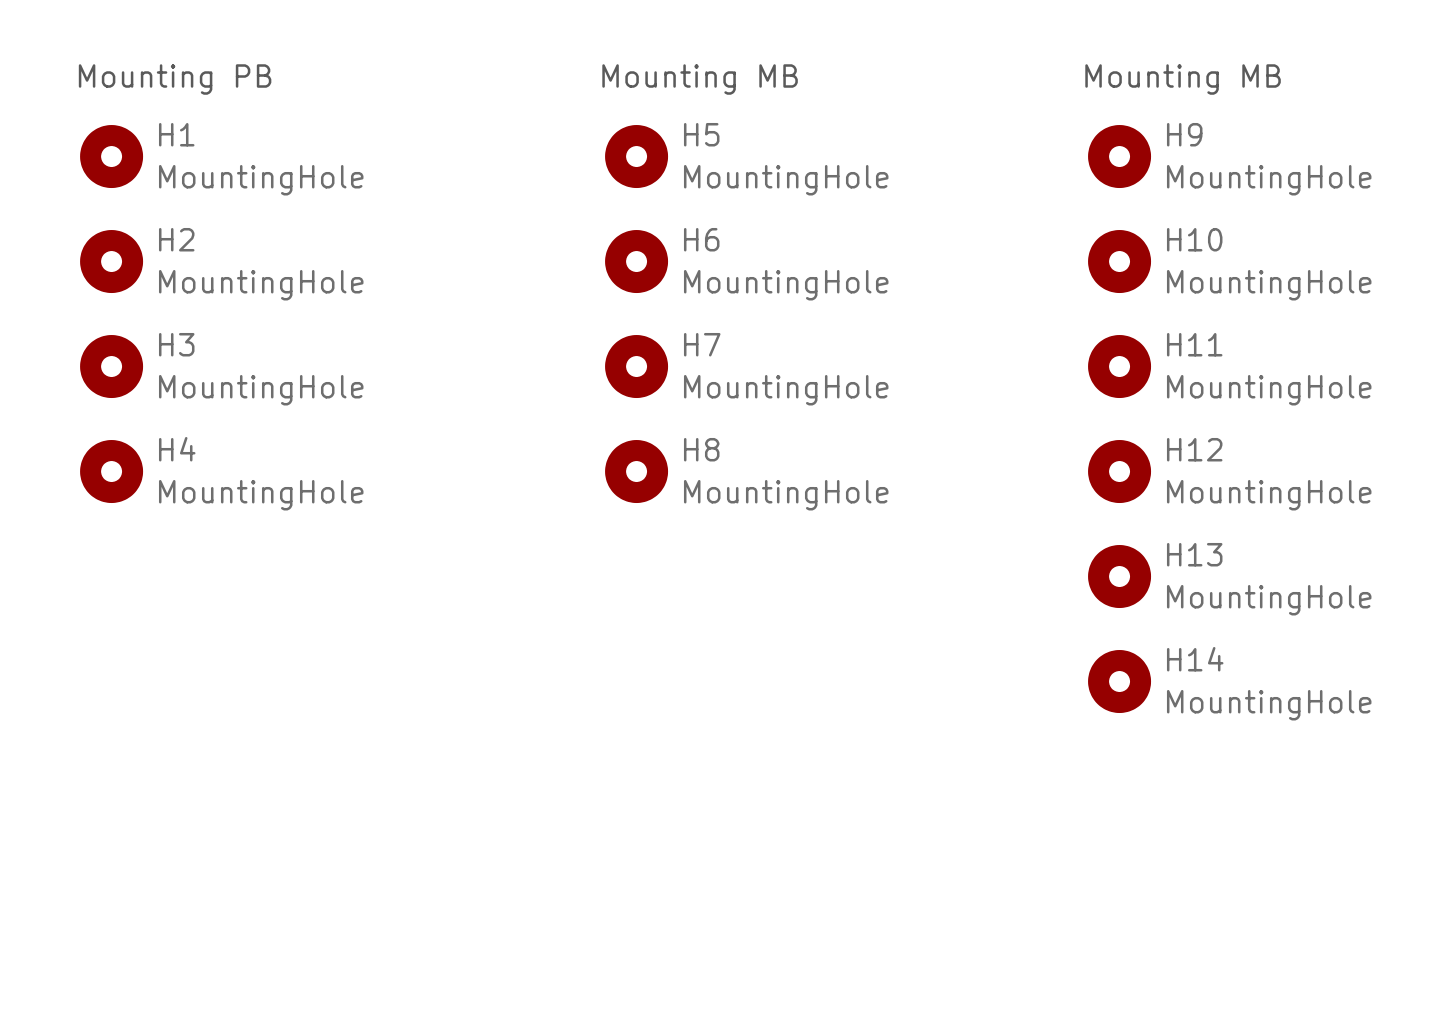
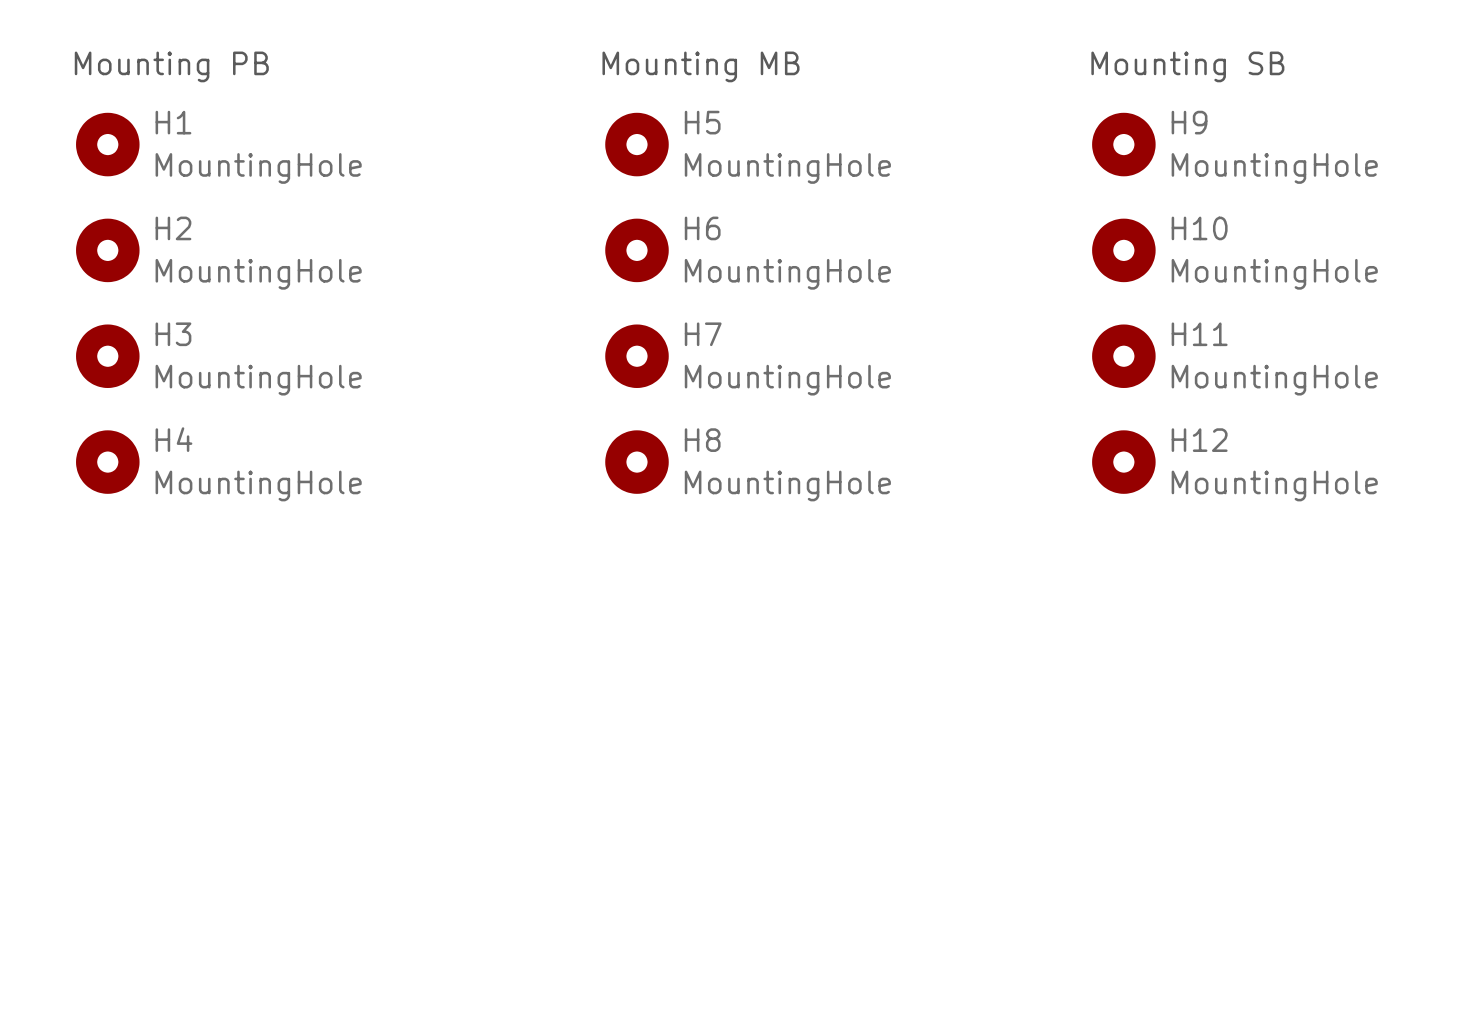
text: Mounting MB (1183, 79) -> Mounting SB (1187, 66)
H13: MountingHole (1119, 576) -> none
H14: MountingHole (1119, 681) -> none

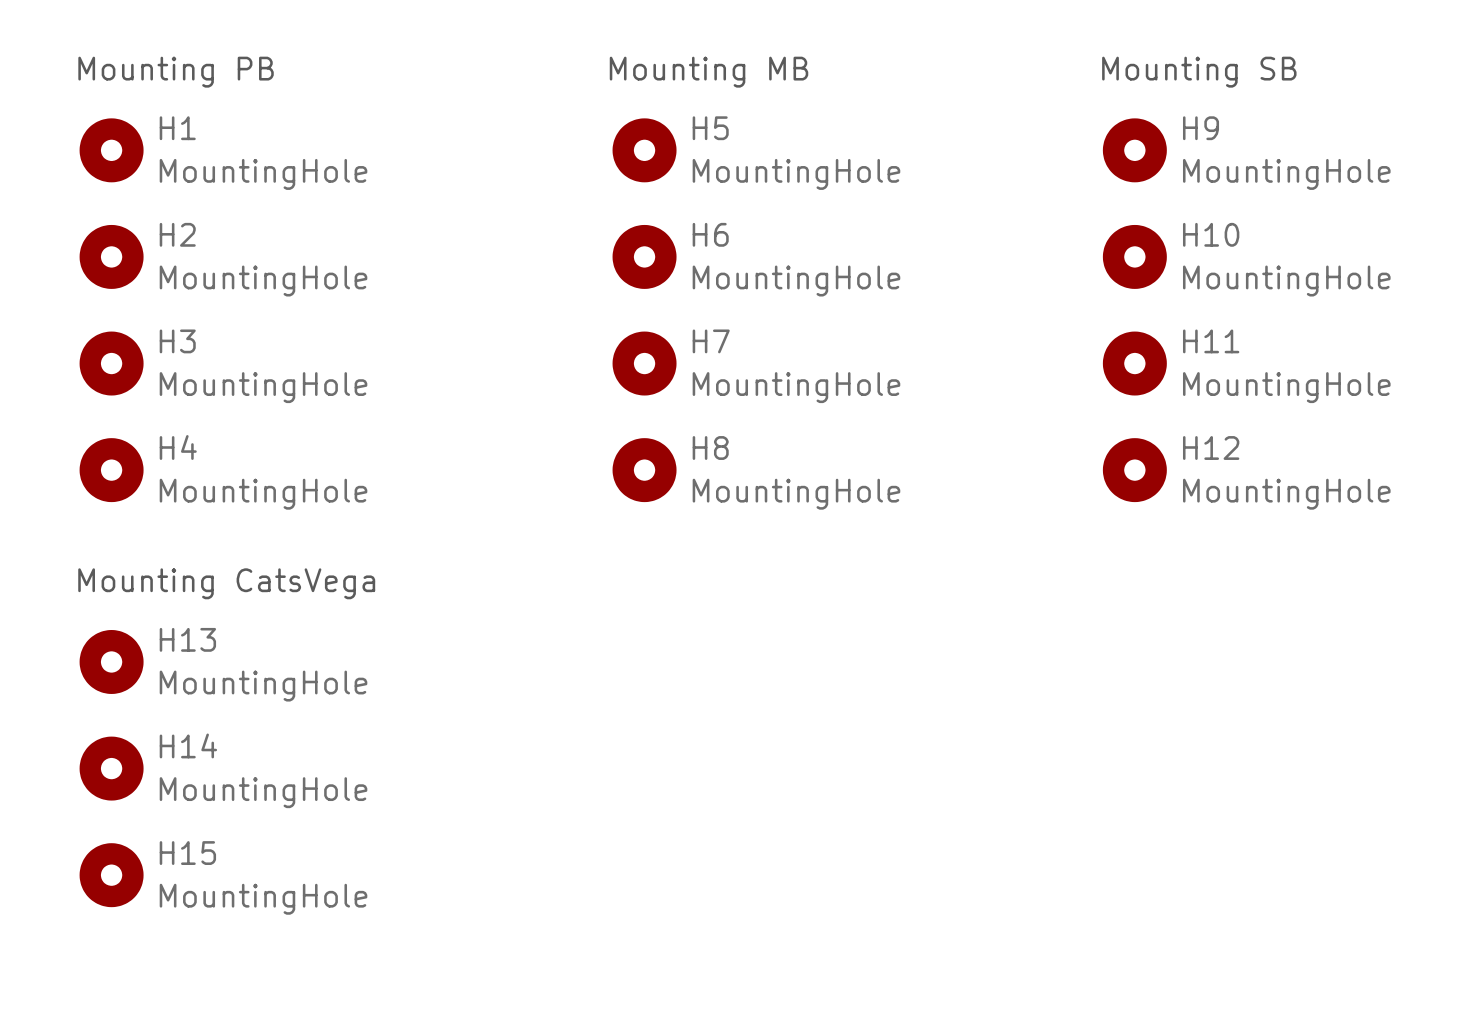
text: none -> Mounting CatsVega (226, 583)
H13: none -> MountingHole (111, 661)
H14: none -> MountingHole (111, 768)
H15: none -> MountingHole (111, 875)

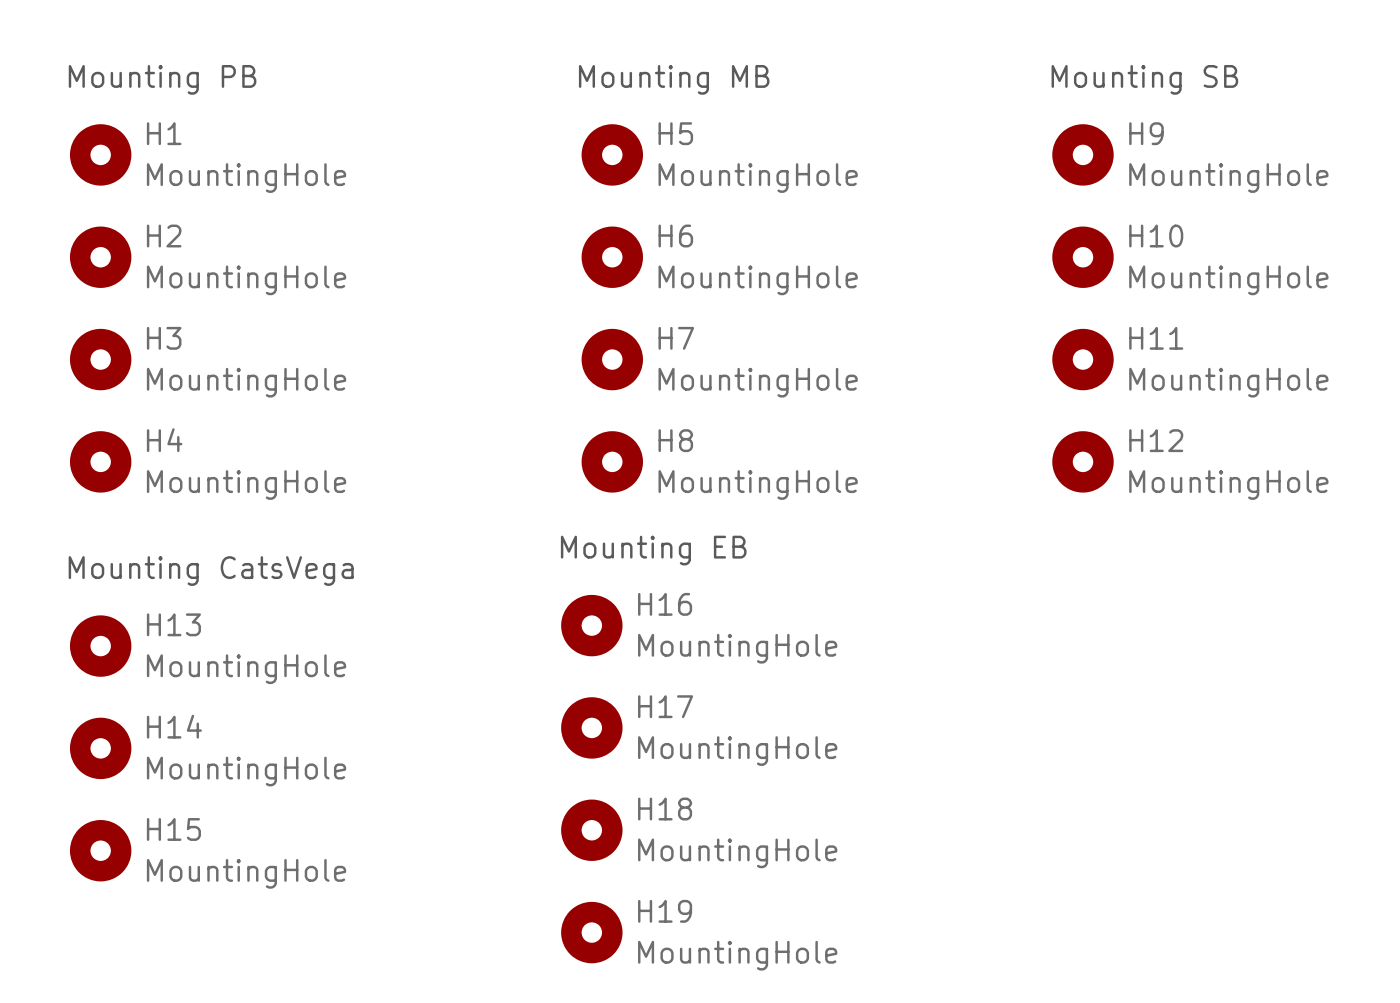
text: none -> Mounting EB (653, 550)
H16: none -> MountingHole (591, 625)
H17: none -> MountingHole (591, 727)
H18: none -> MountingHole (591, 830)
H19: none -> MountingHole (591, 932)

